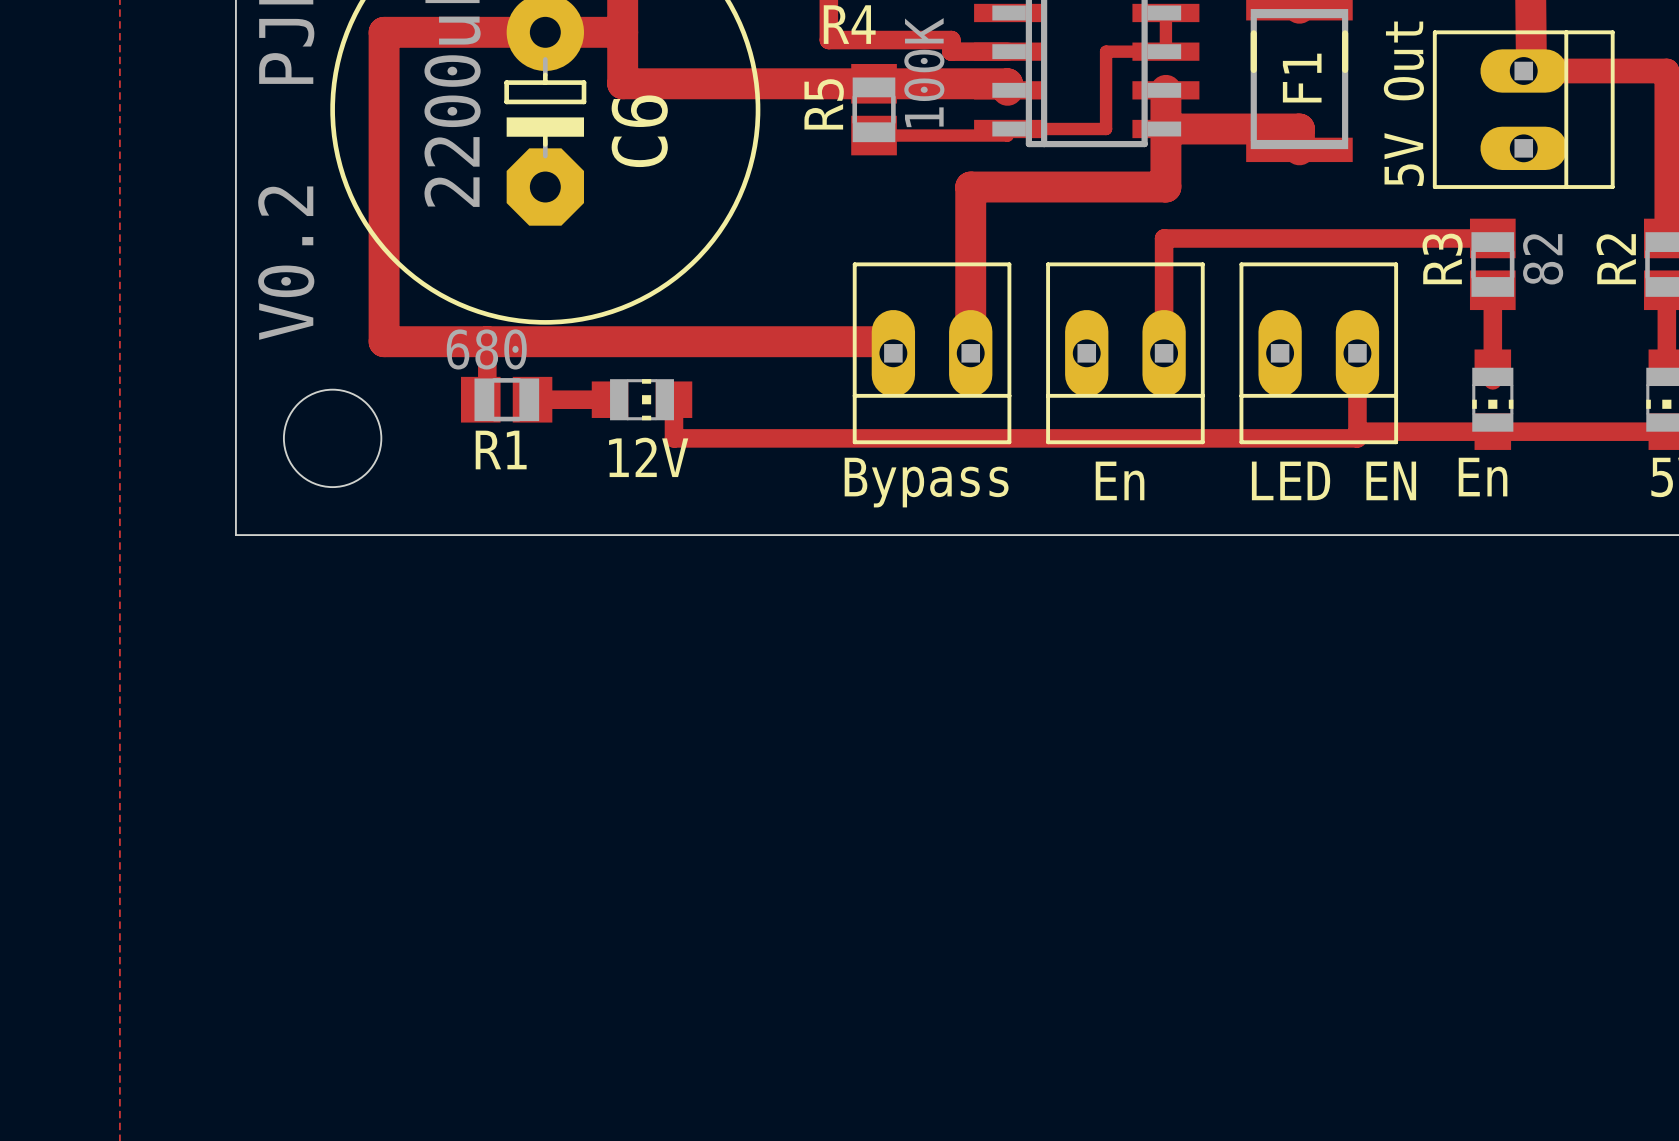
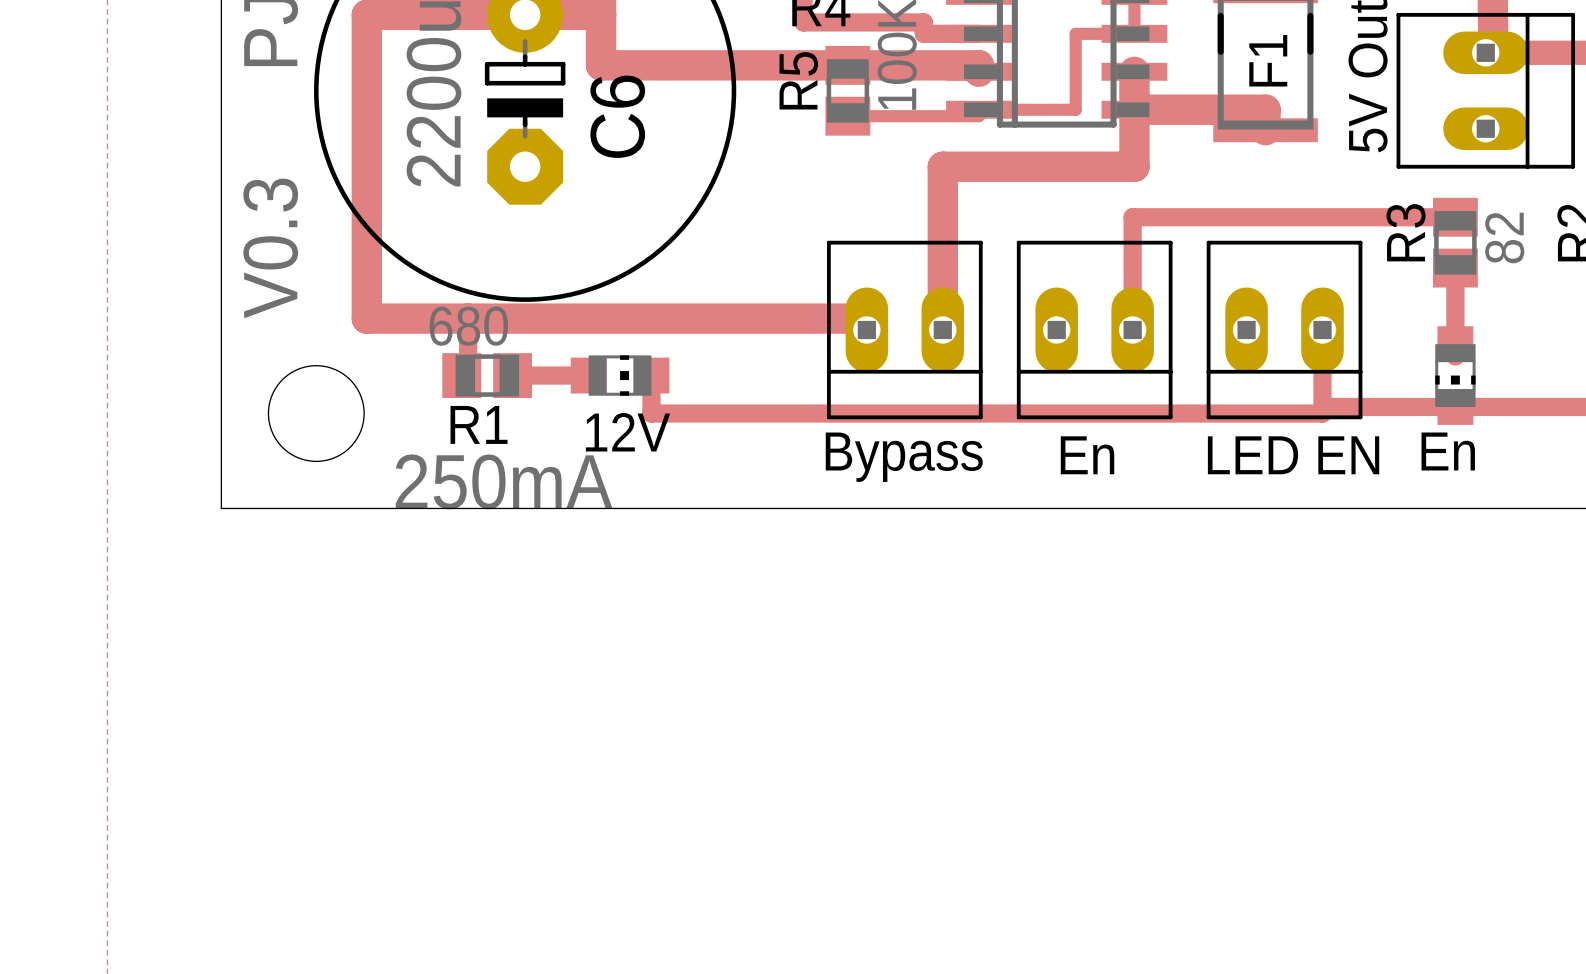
text: V0.2 (286, 263) -> V0.3 (270, 248)
text: none -> 250mA (504, 481)

